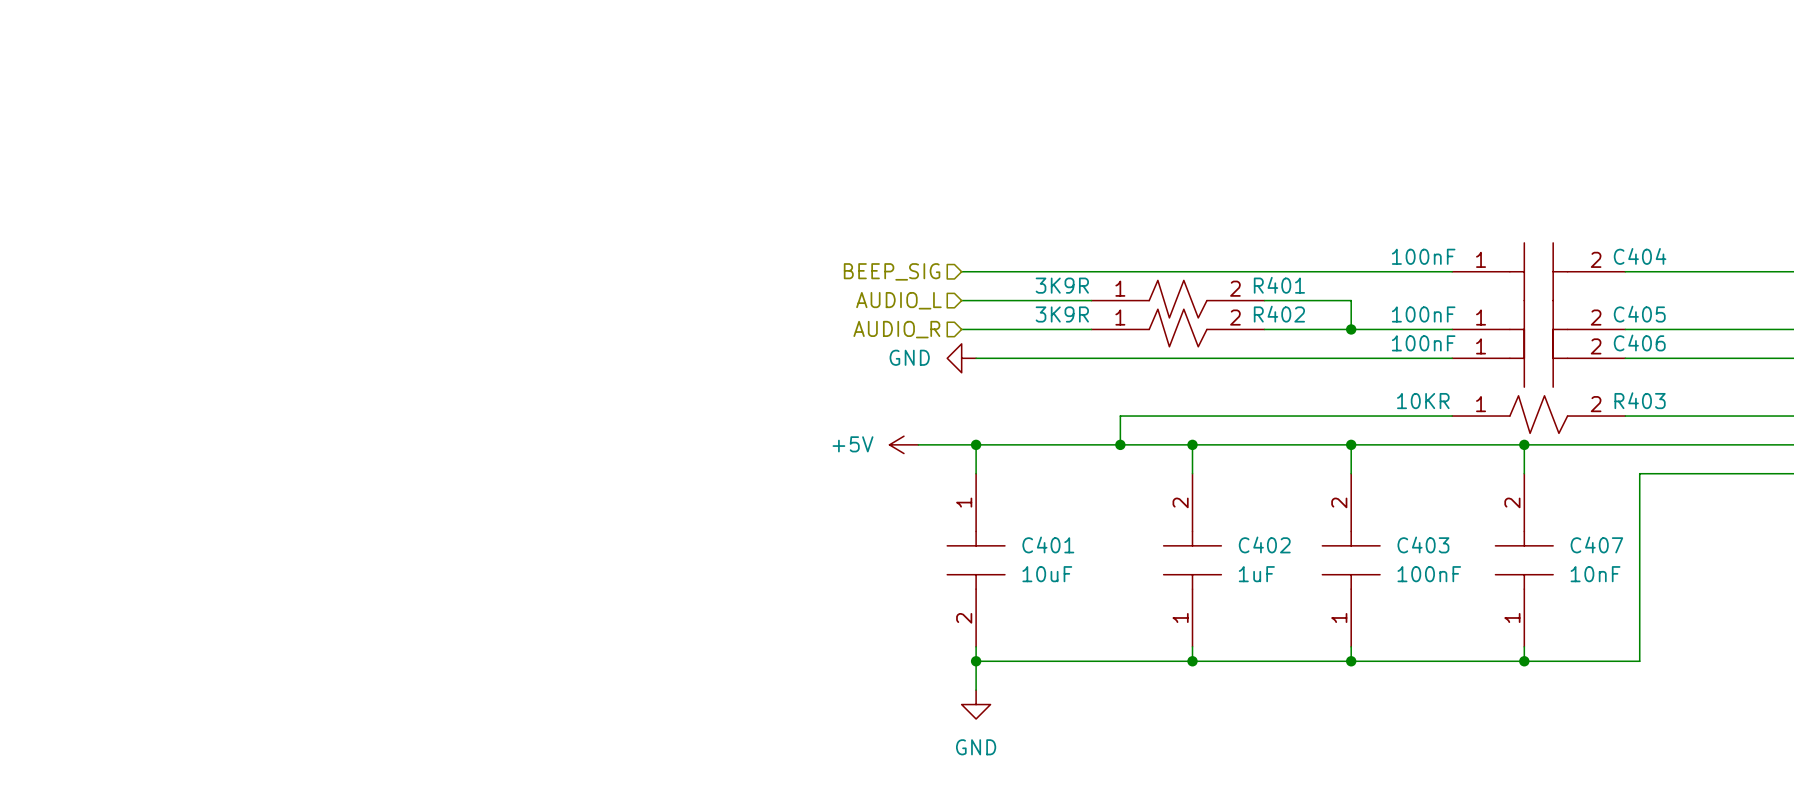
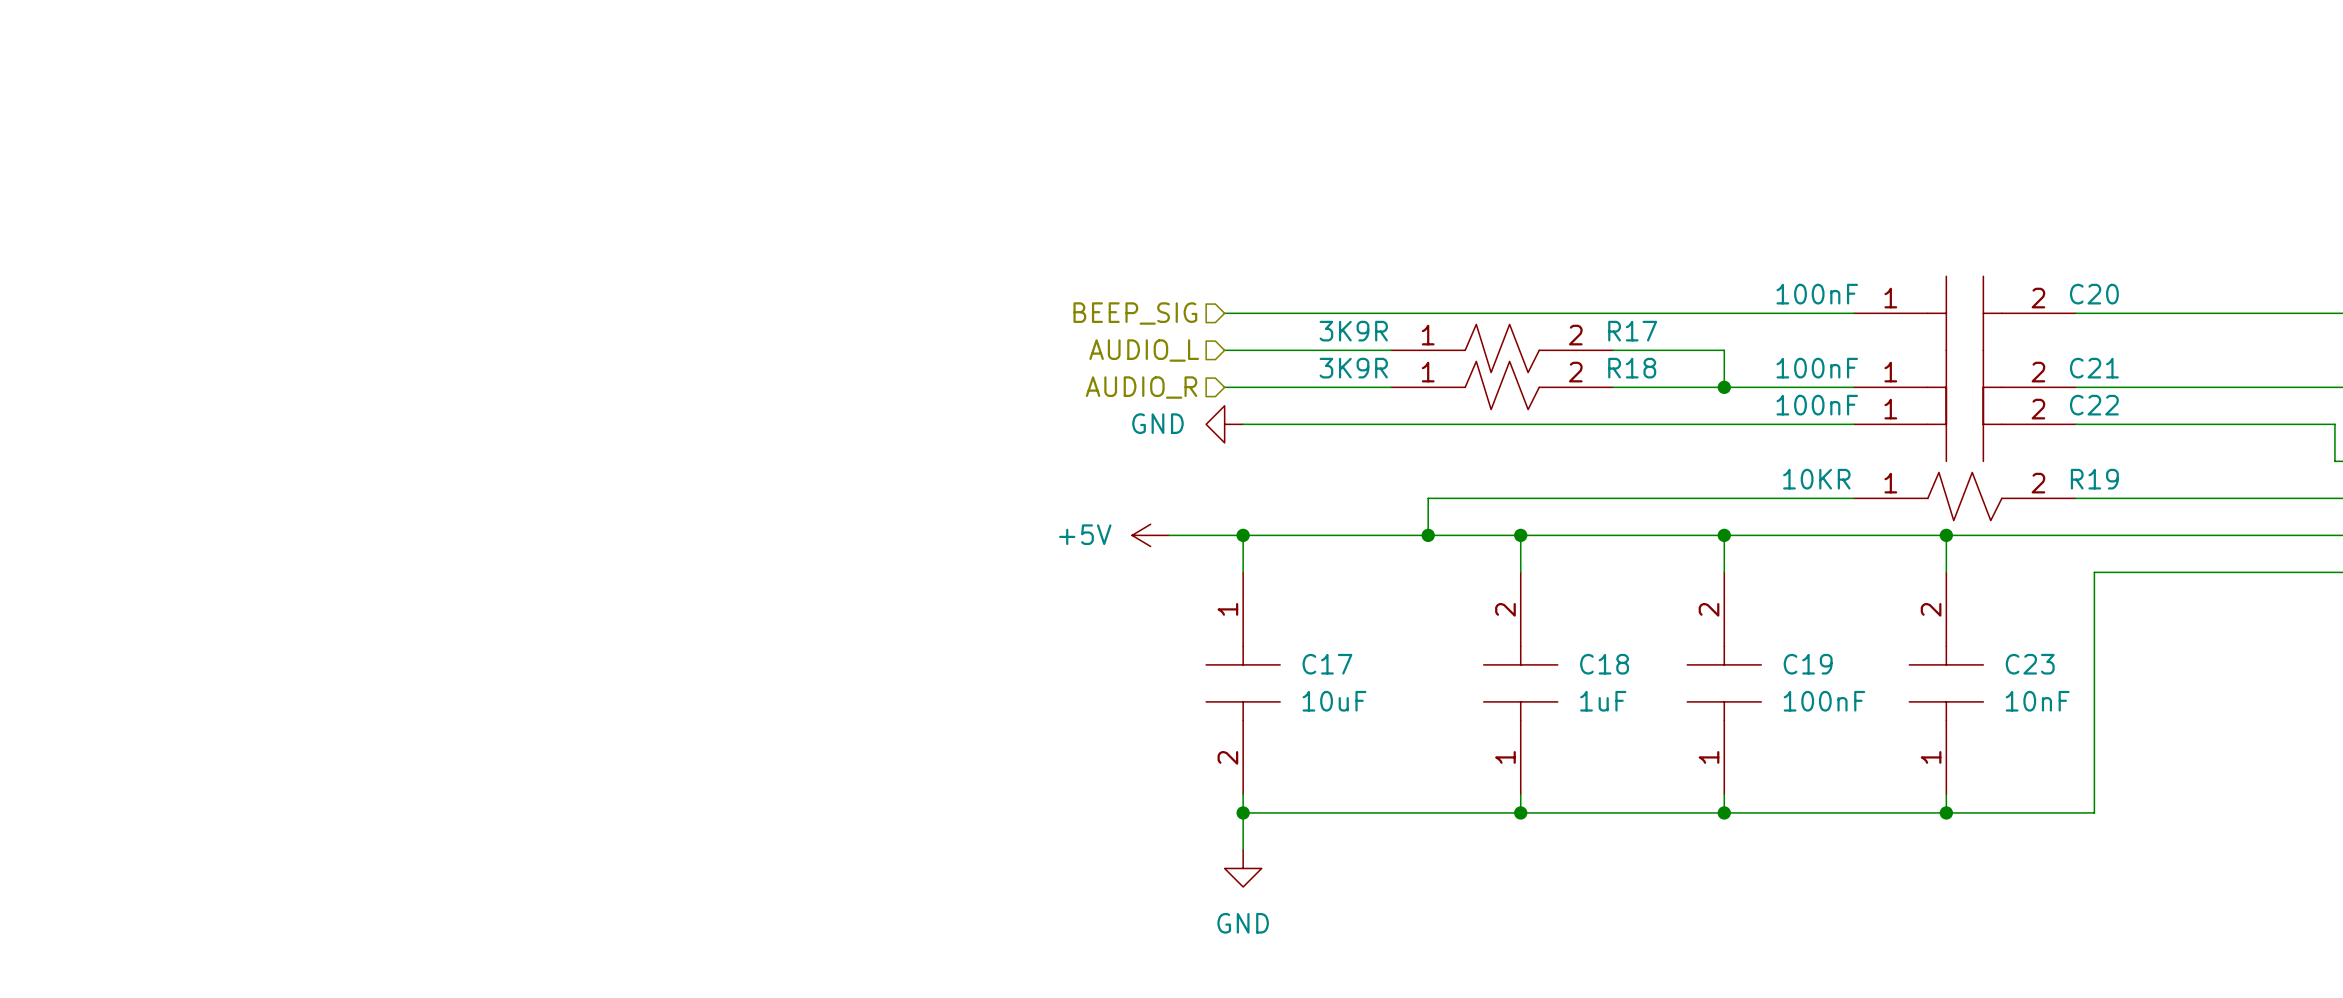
C404 name: C404 (1640, 256) -> C20 (2094, 294)
R401 name: R401 (1279, 285) -> R17 (1632, 331)
R402 name: R402 (1279, 314) -> R18 (1632, 368)
C405 name: C405 (1639, 314) -> C21 (2094, 368)
C406 name: C406 (1639, 343) -> C22 (2094, 405)
R403 name: R403 (1640, 400) -> R19 (2094, 479)
C401 name: C401 (1048, 544) -> C17 (1327, 664)
C402 name: C402 (1264, 544) -> C18 (1604, 664)
C403 name: C403 (1423, 544) -> C19 (1808, 664)
C407 name: C407 (1596, 544) -> C23 (2030, 664)

